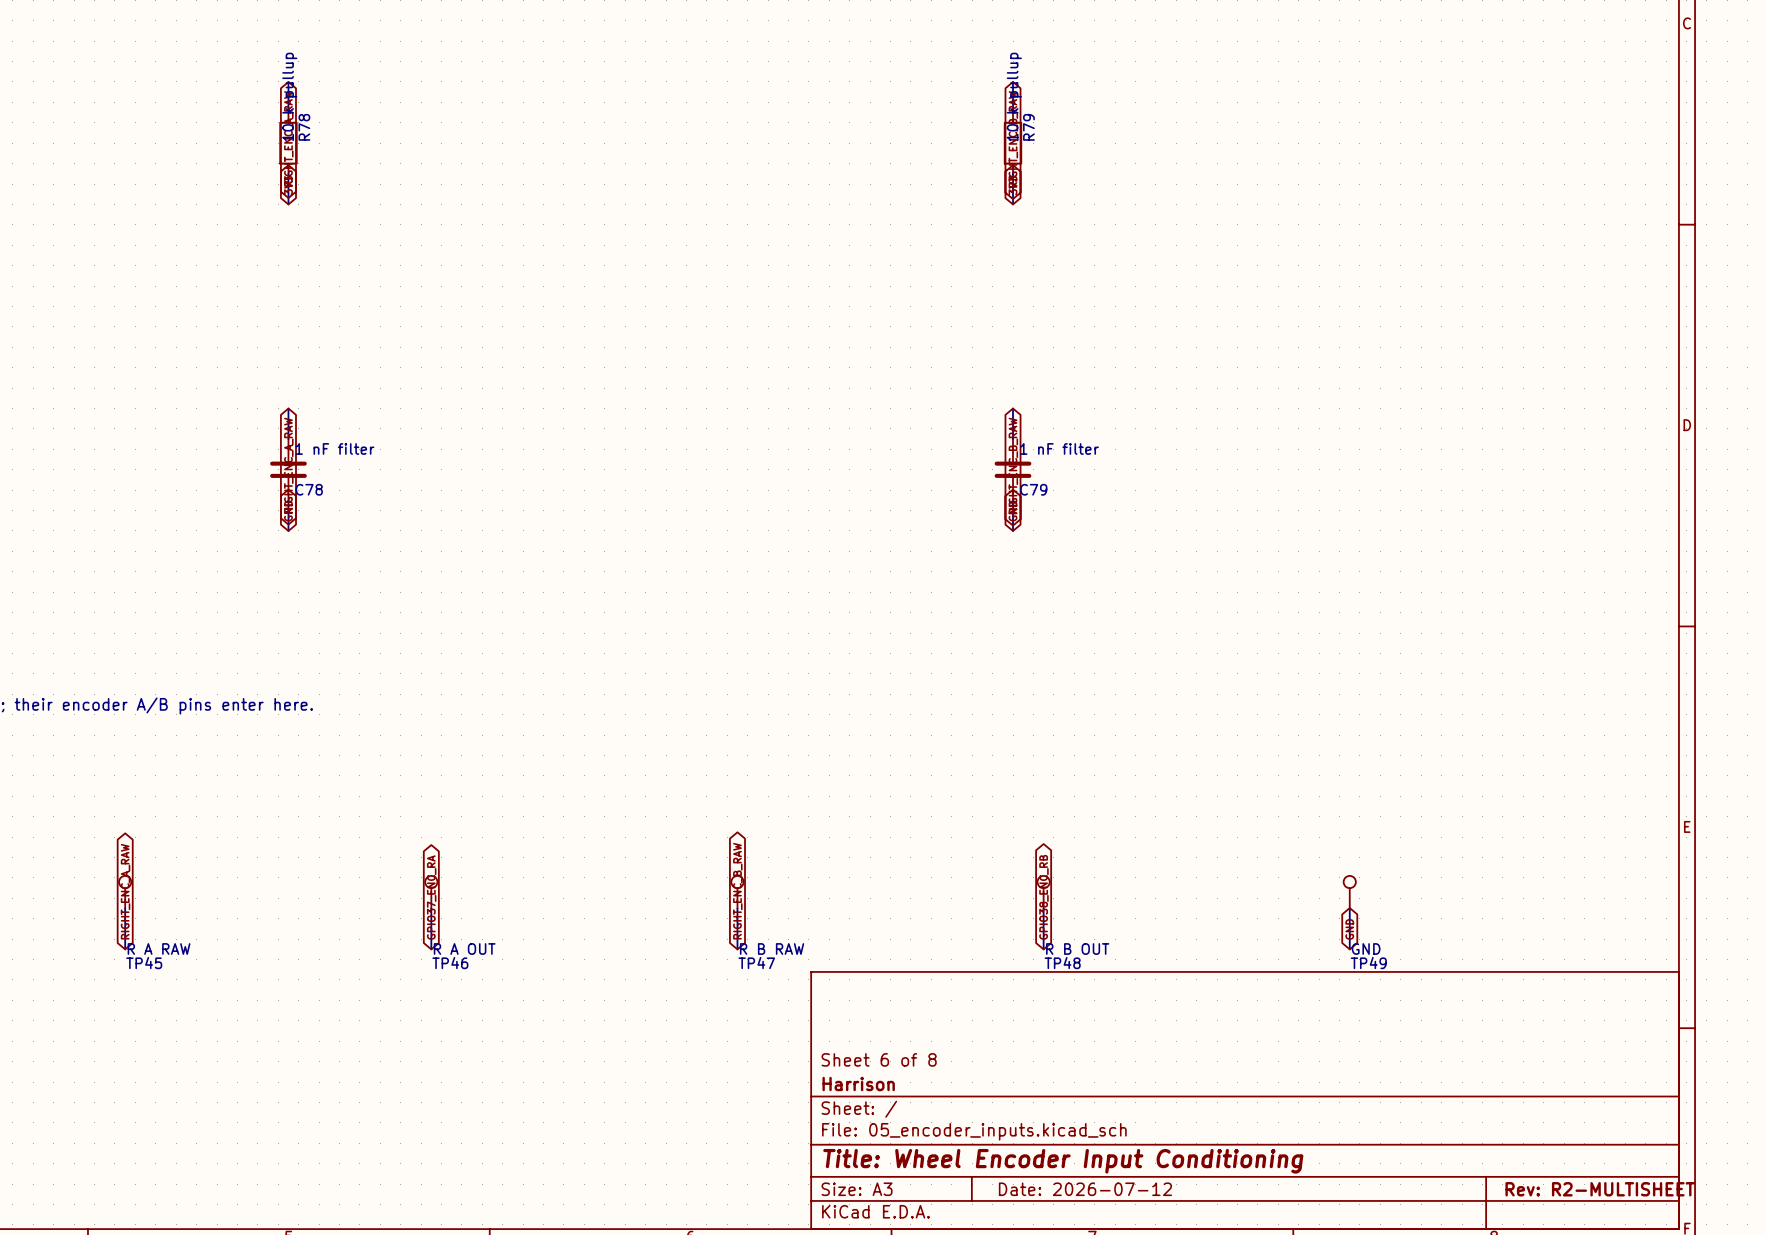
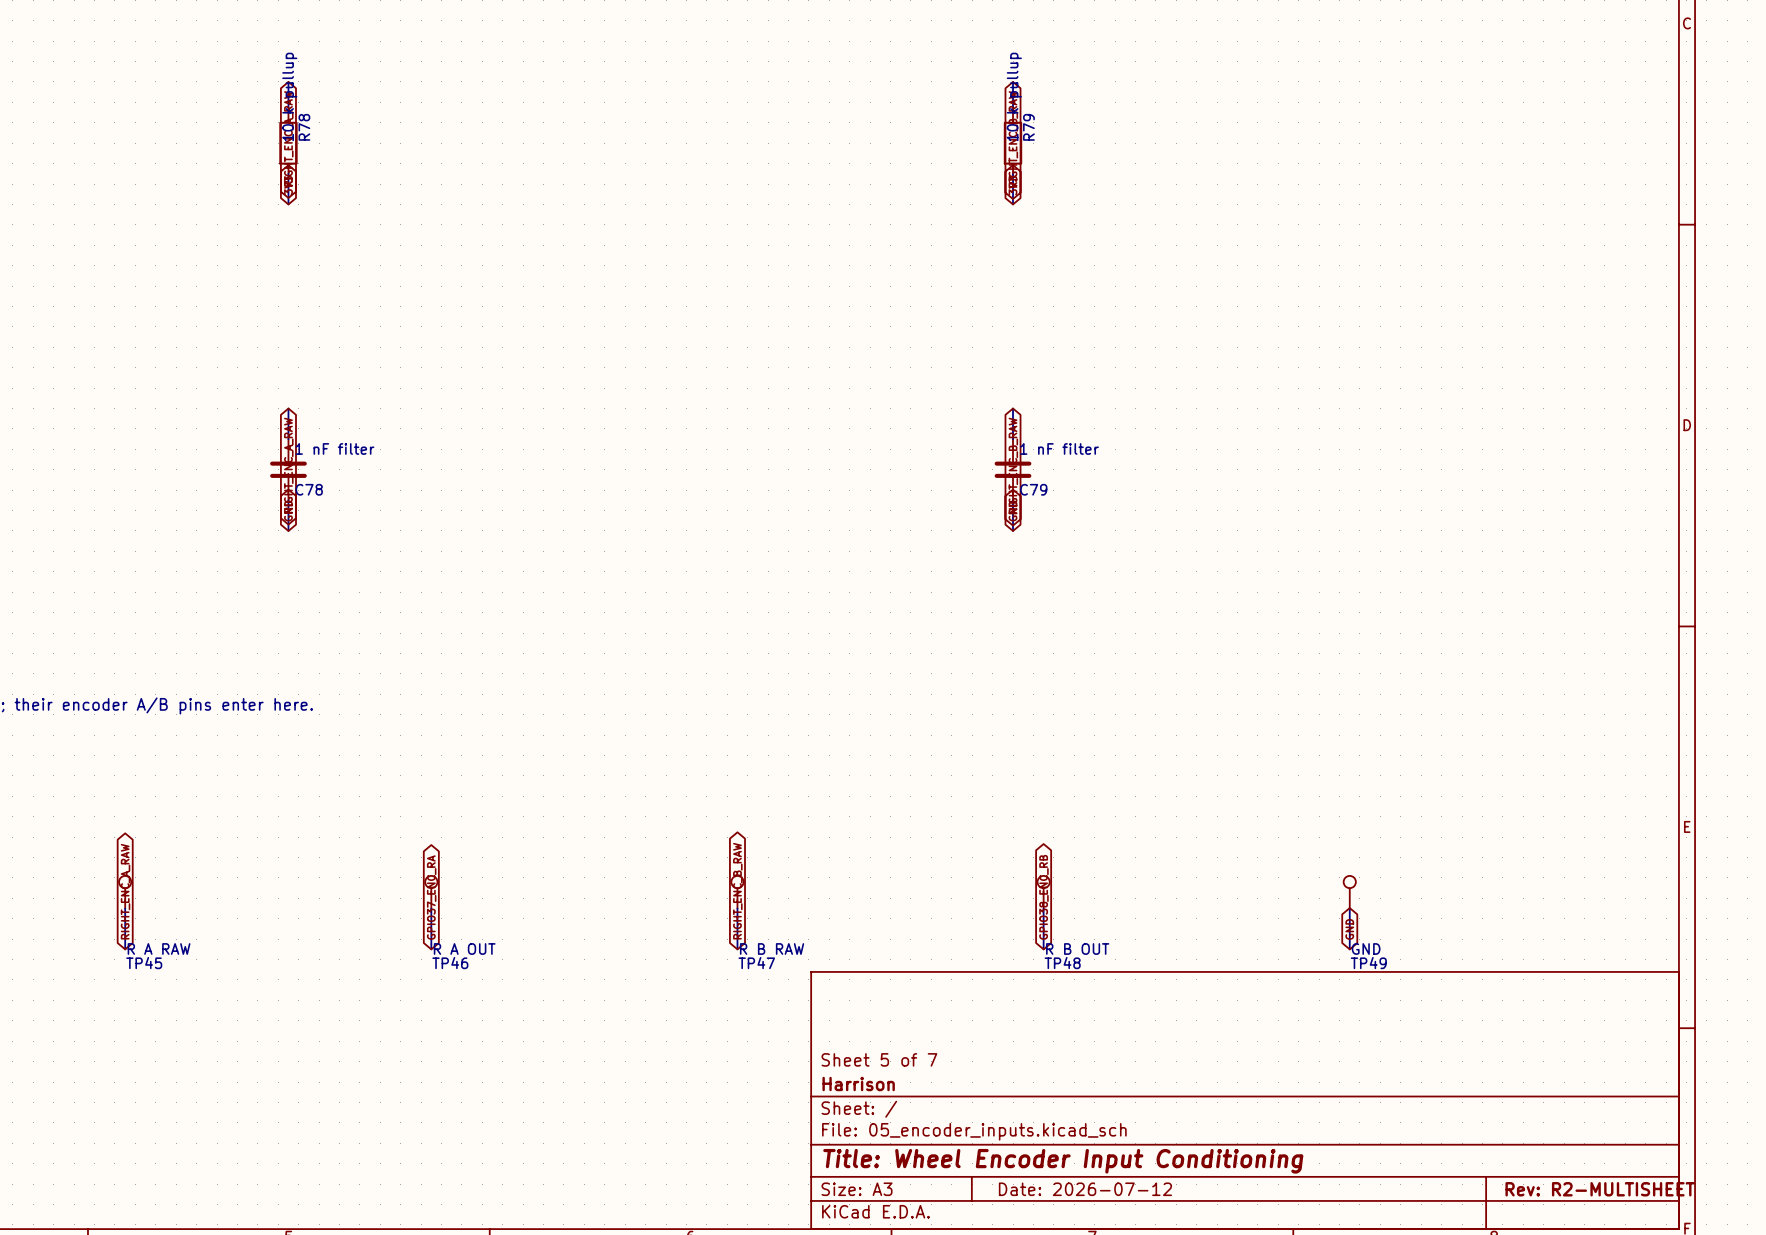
title block: Sheet 6 of 8 (879, 1059) -> Sheet 5 of 7 (879, 1059)

